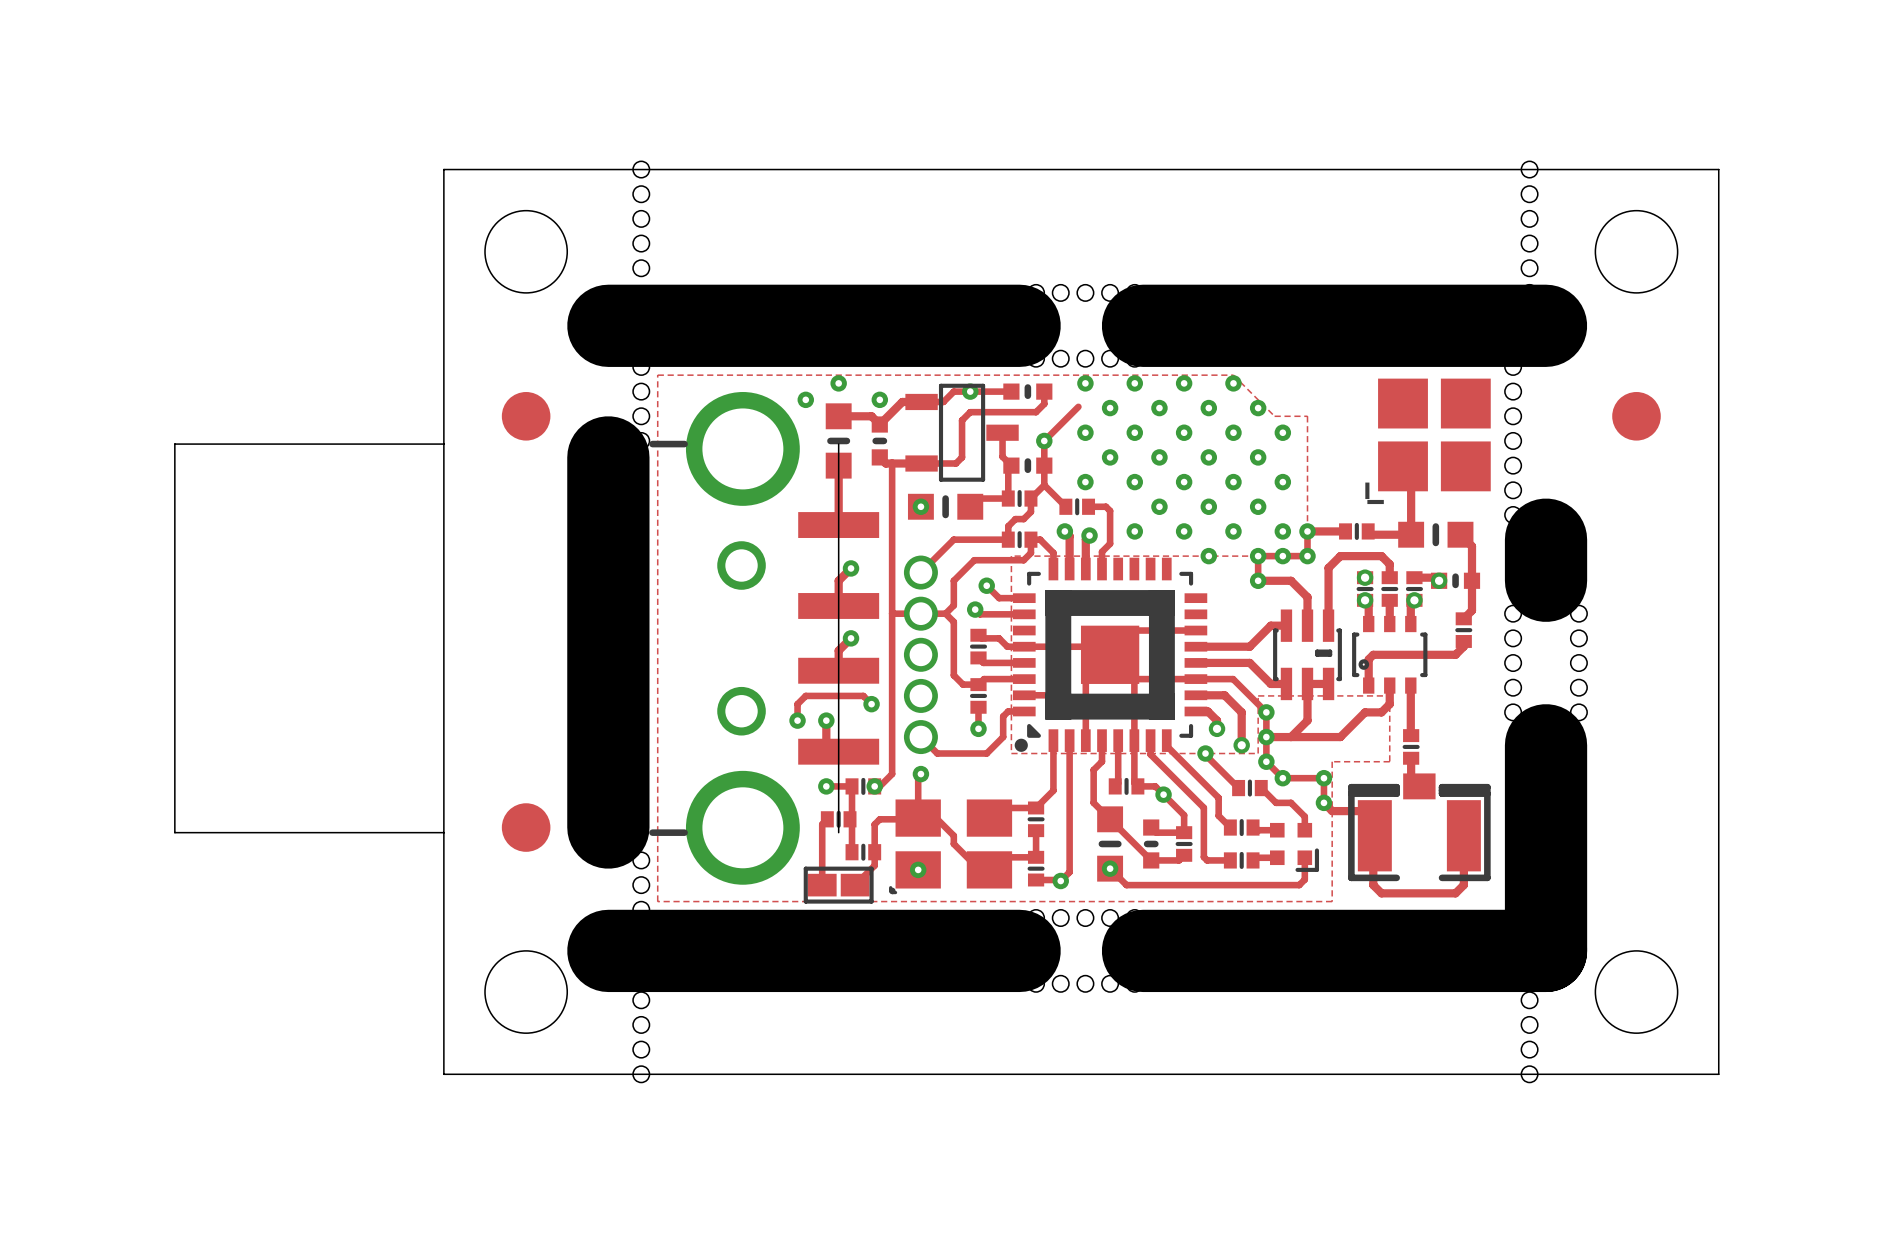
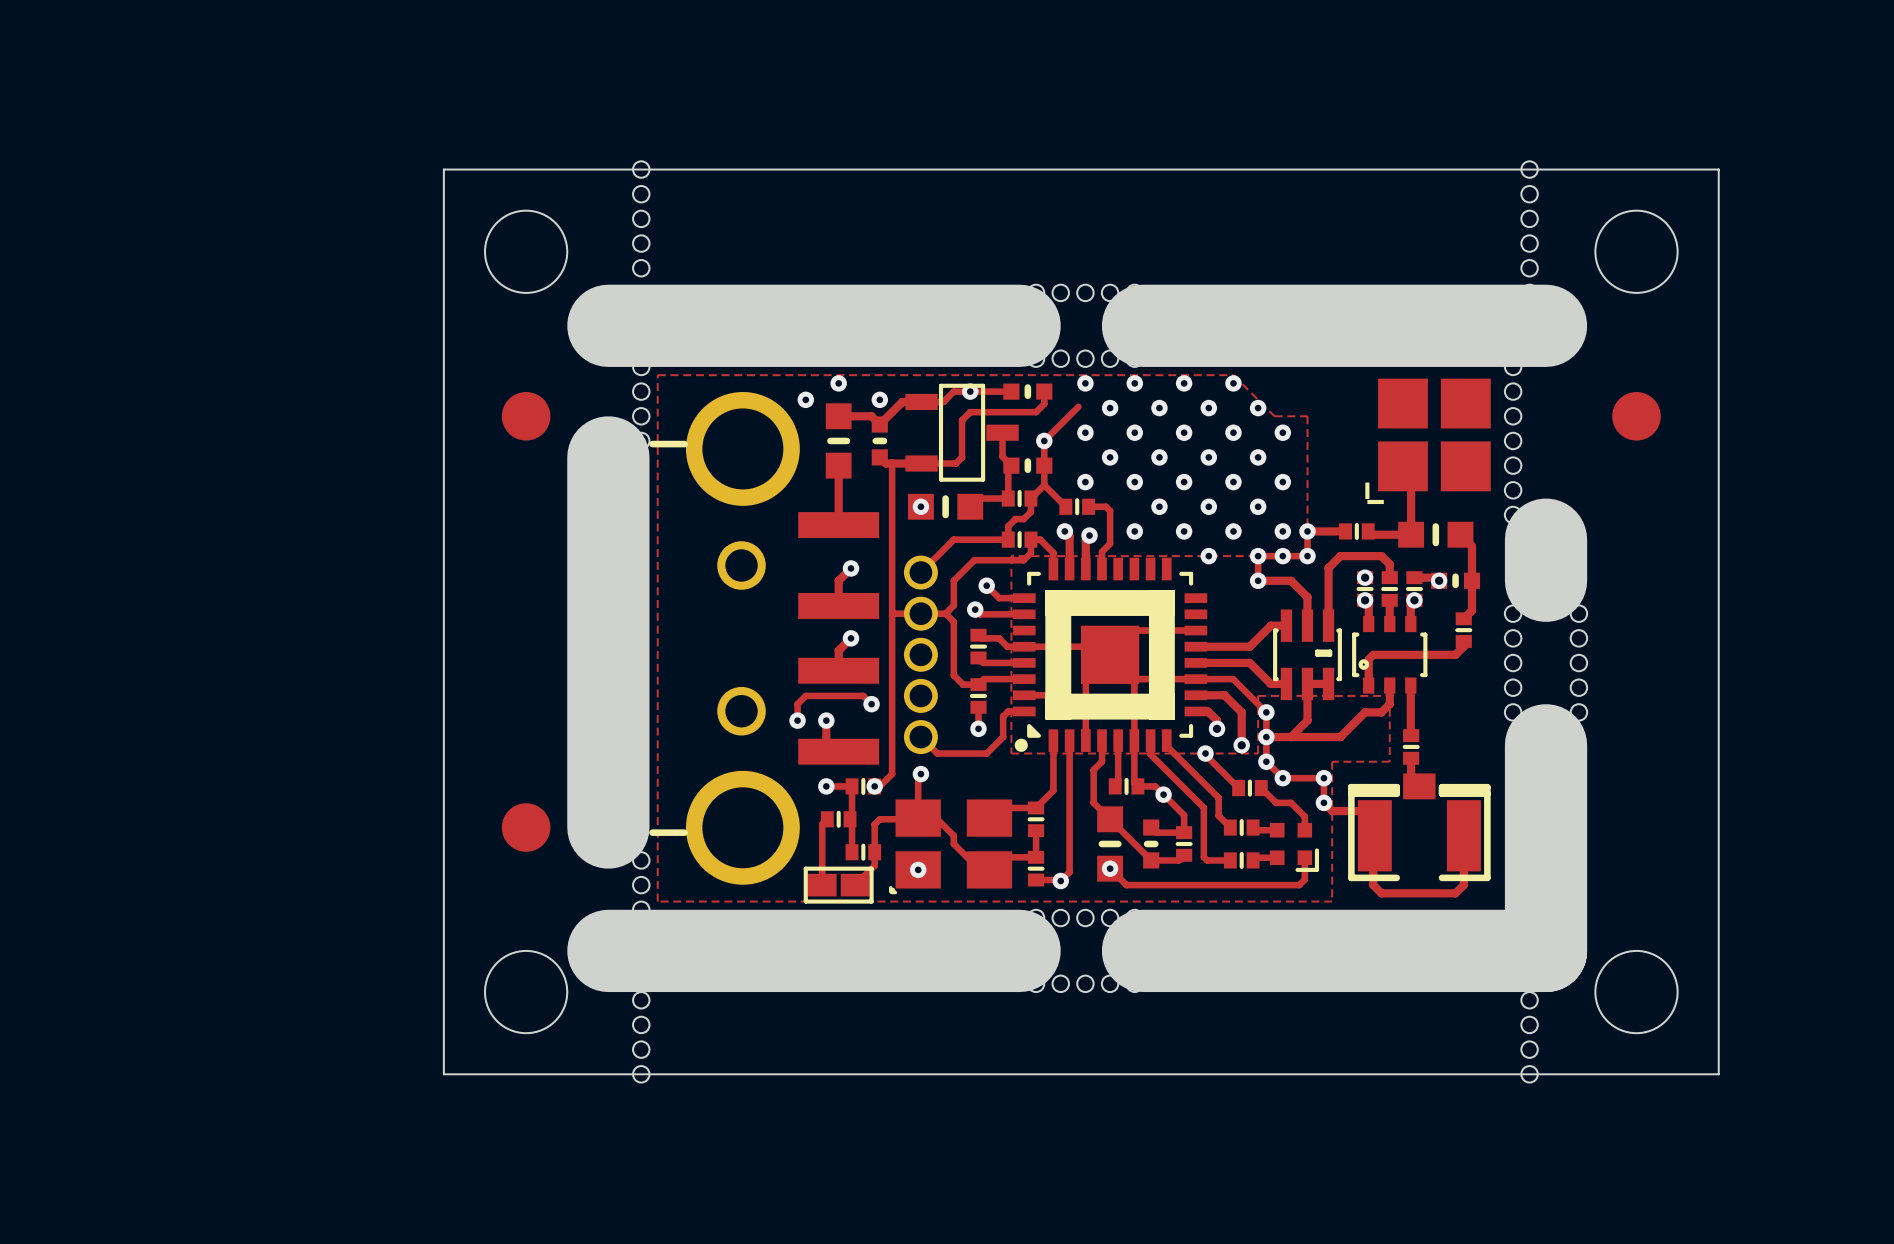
board edge: (443, 444) (174, 444) (174, 832) (443, 832) -> none
board edge: (838, 444) (838, 832) -> none

